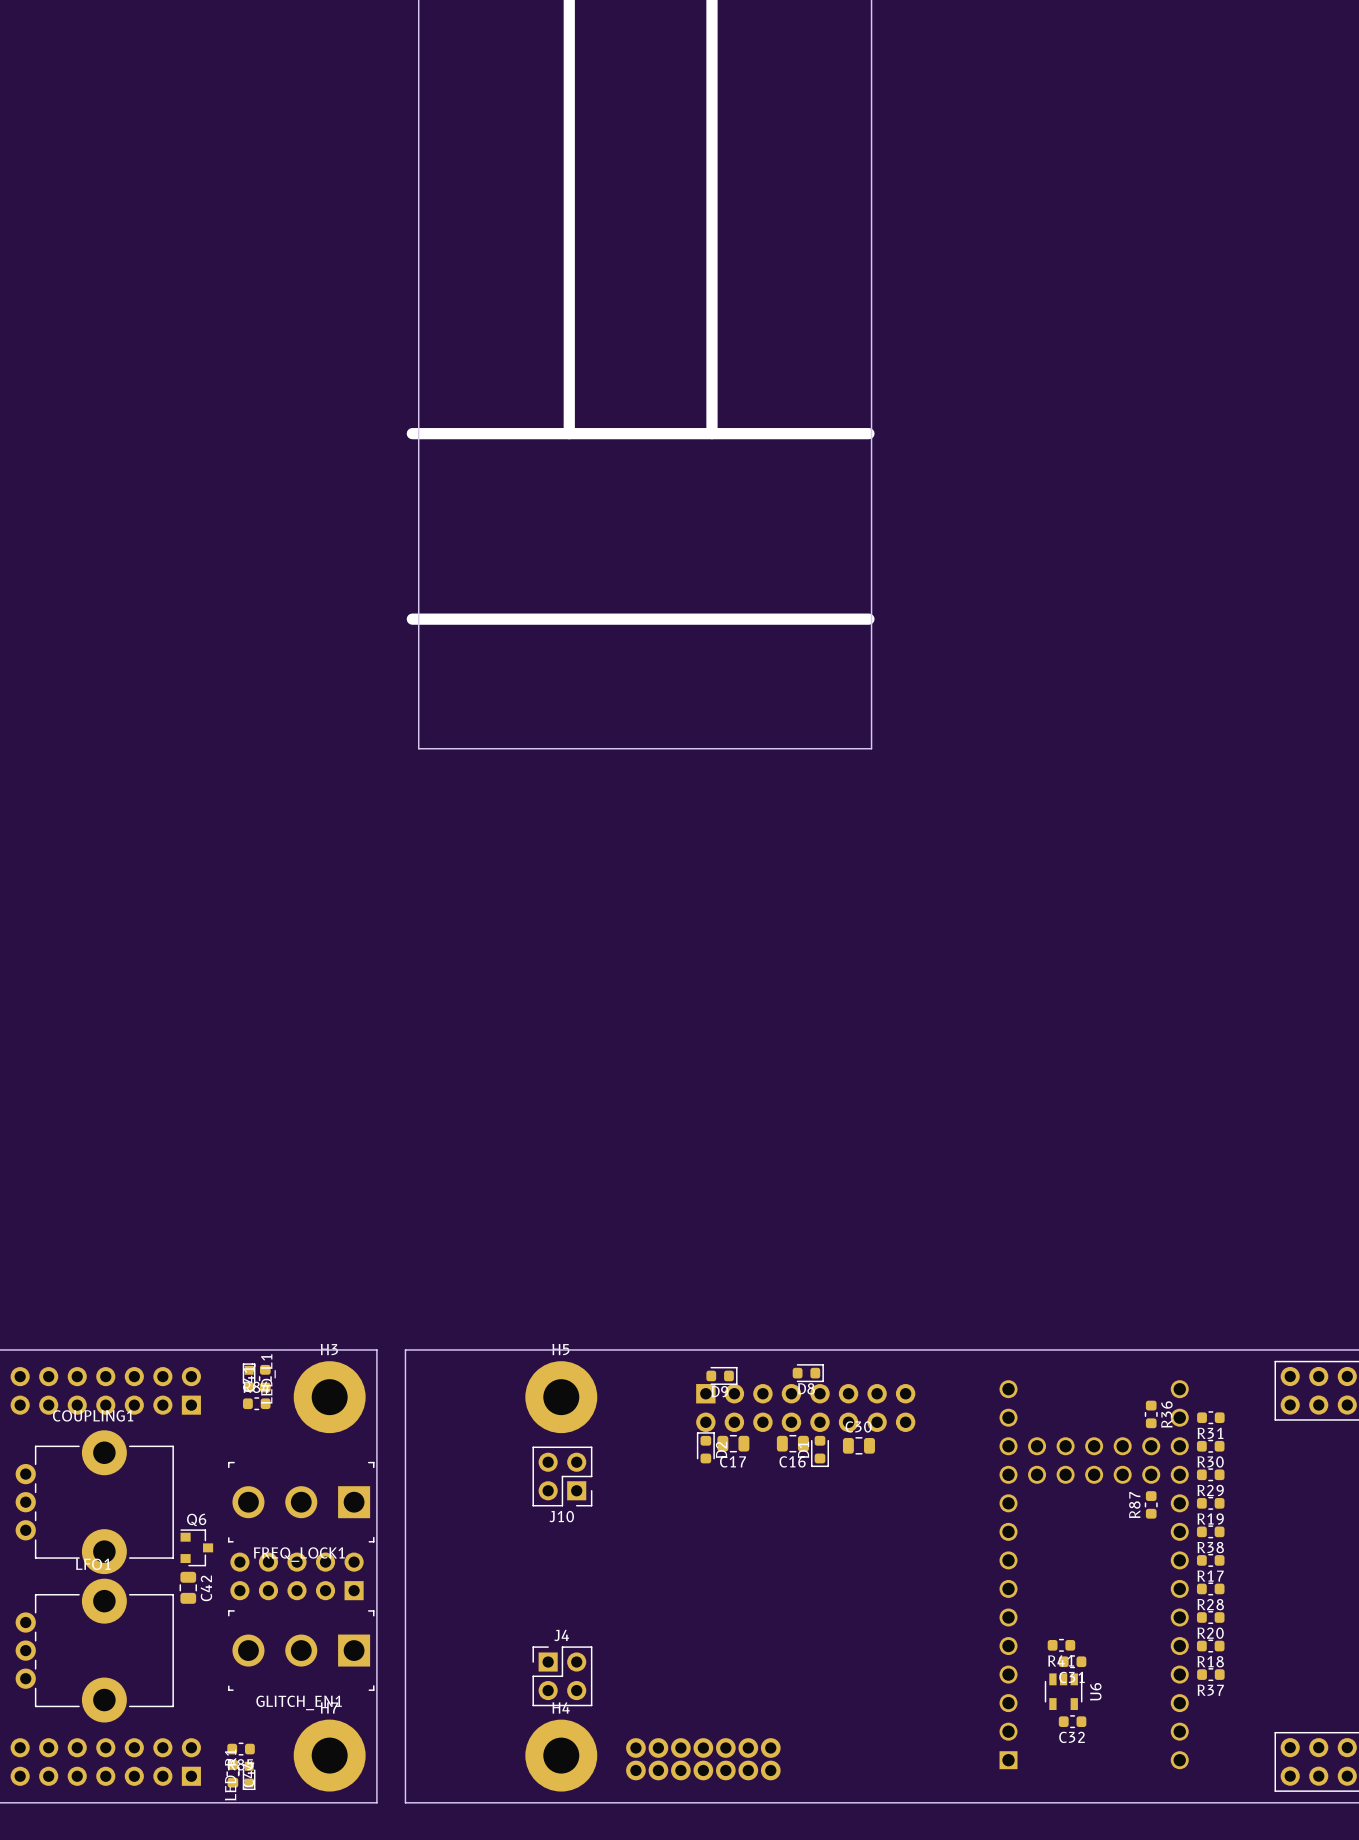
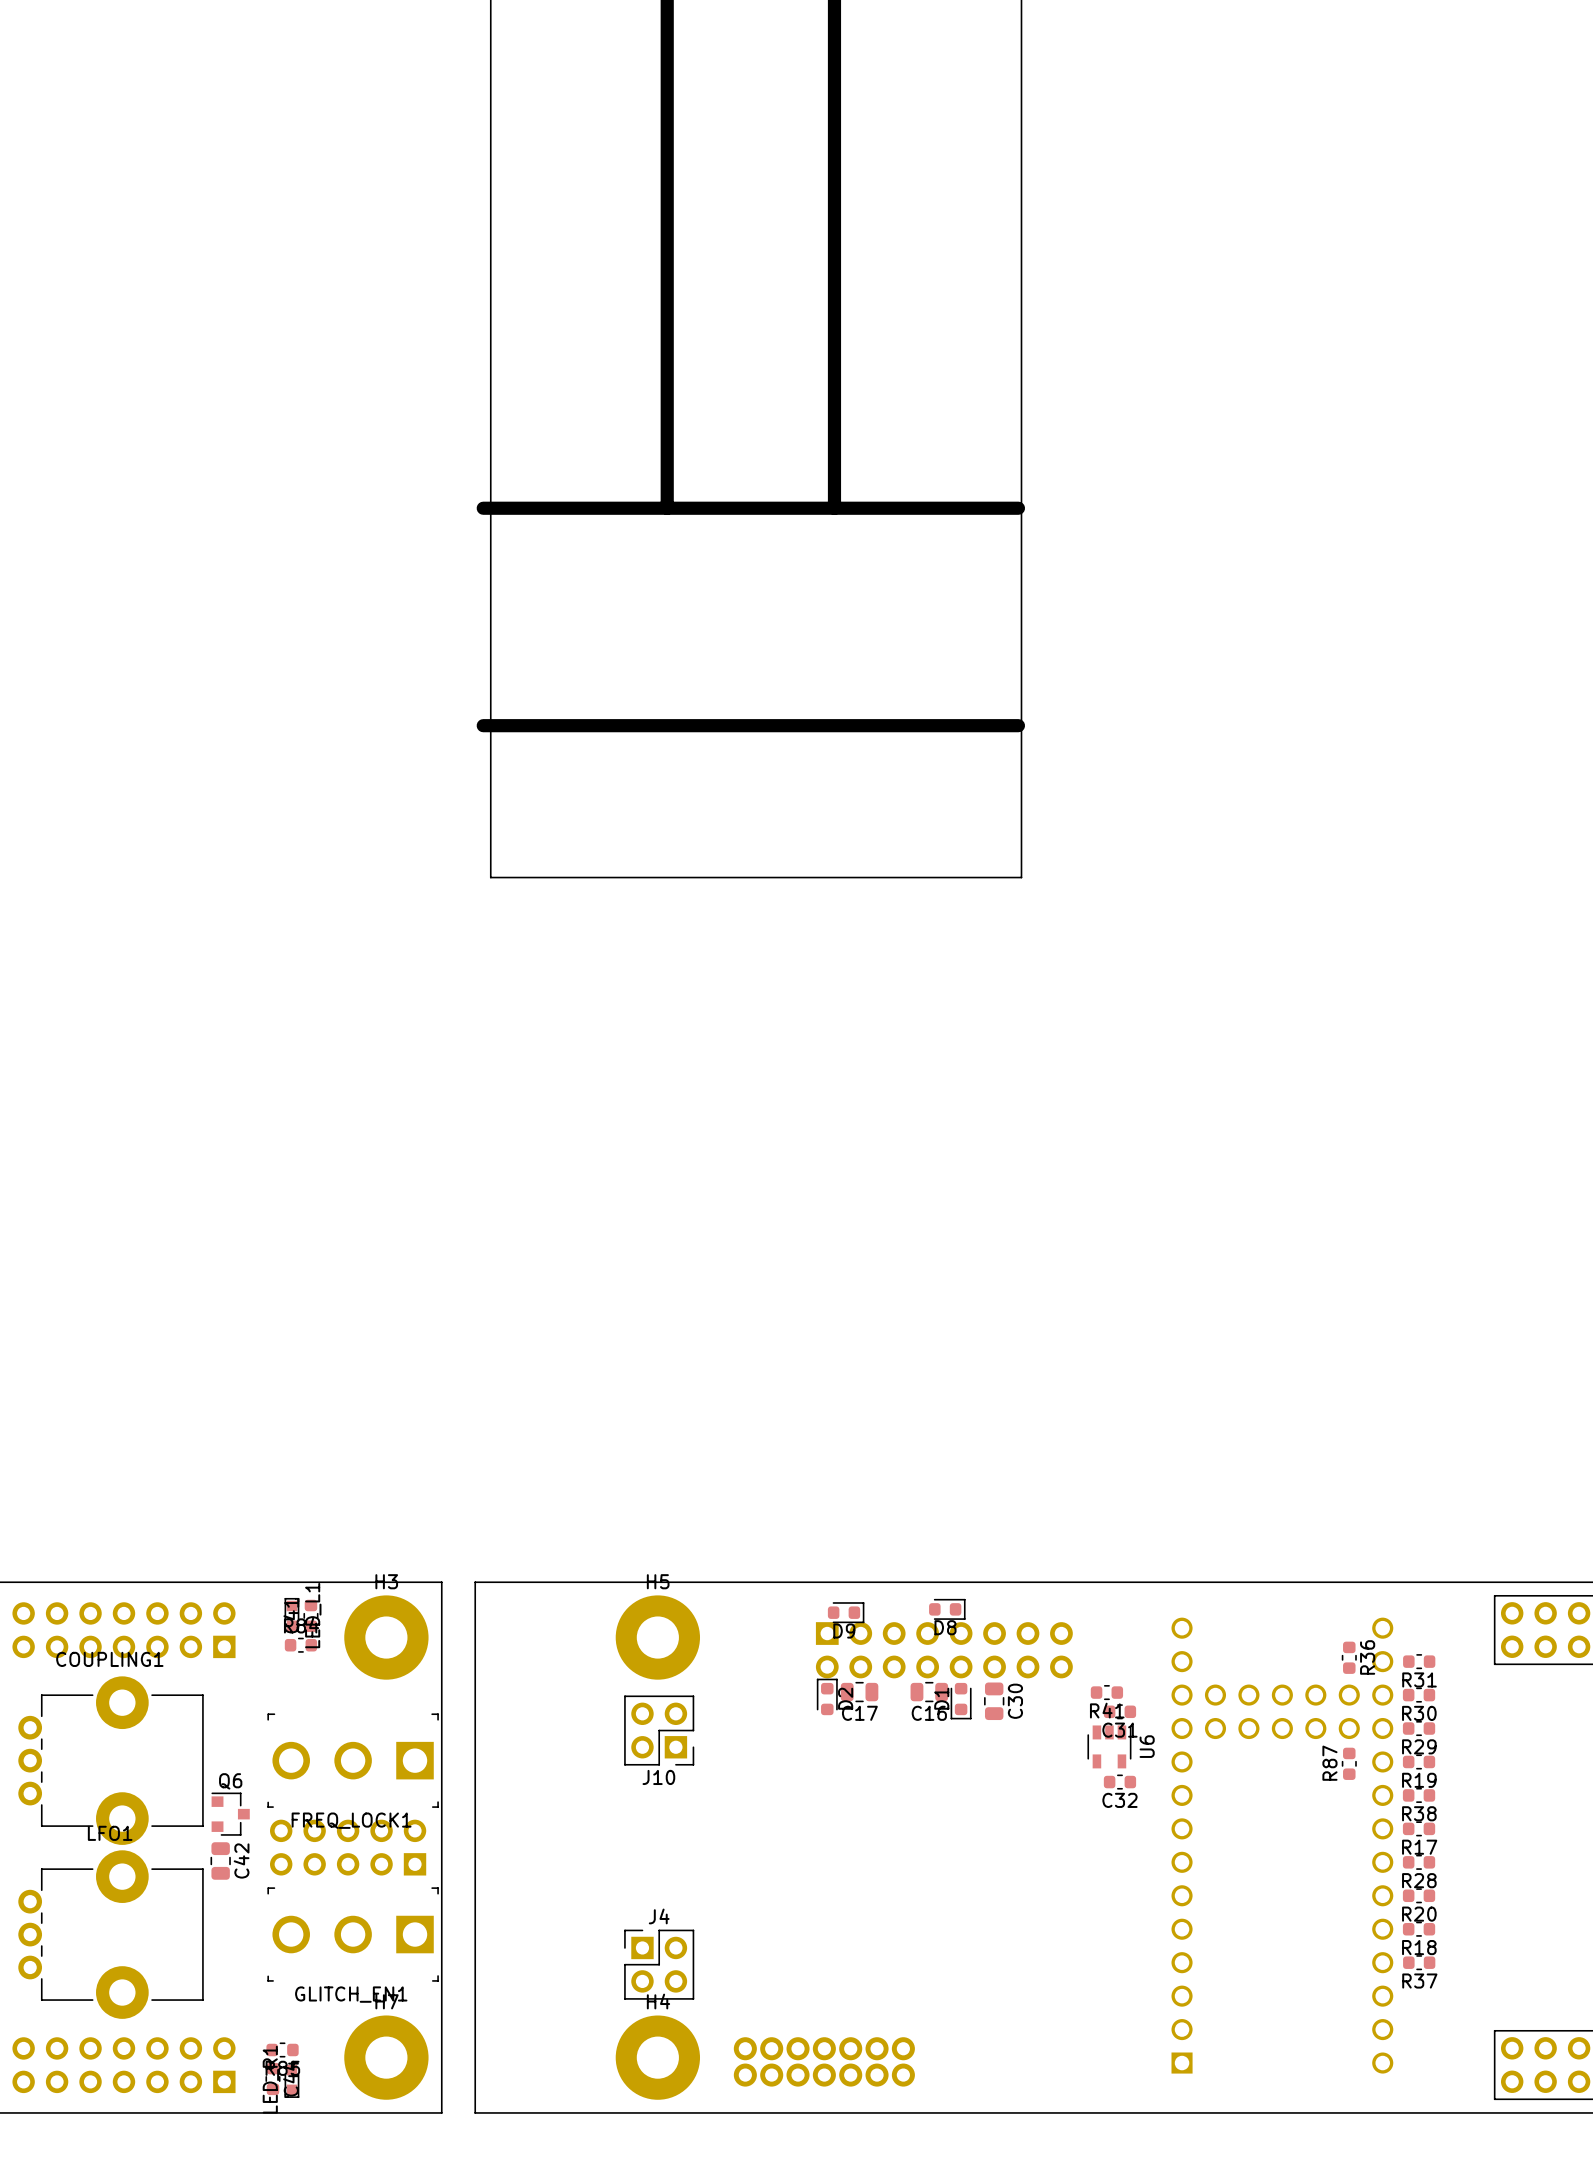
C30 rotation: 0° (858, 1445) -> 90° clockwise (994, 1701)
R41 position: (1061, 1645) -> (1106, 1692)
C31 position: (1072, 1661) -> (1119, 1711)
U6 position: (1063, 1691) -> (1109, 1746)
C32 position: (1072, 1721) -> (1119, 1782)

